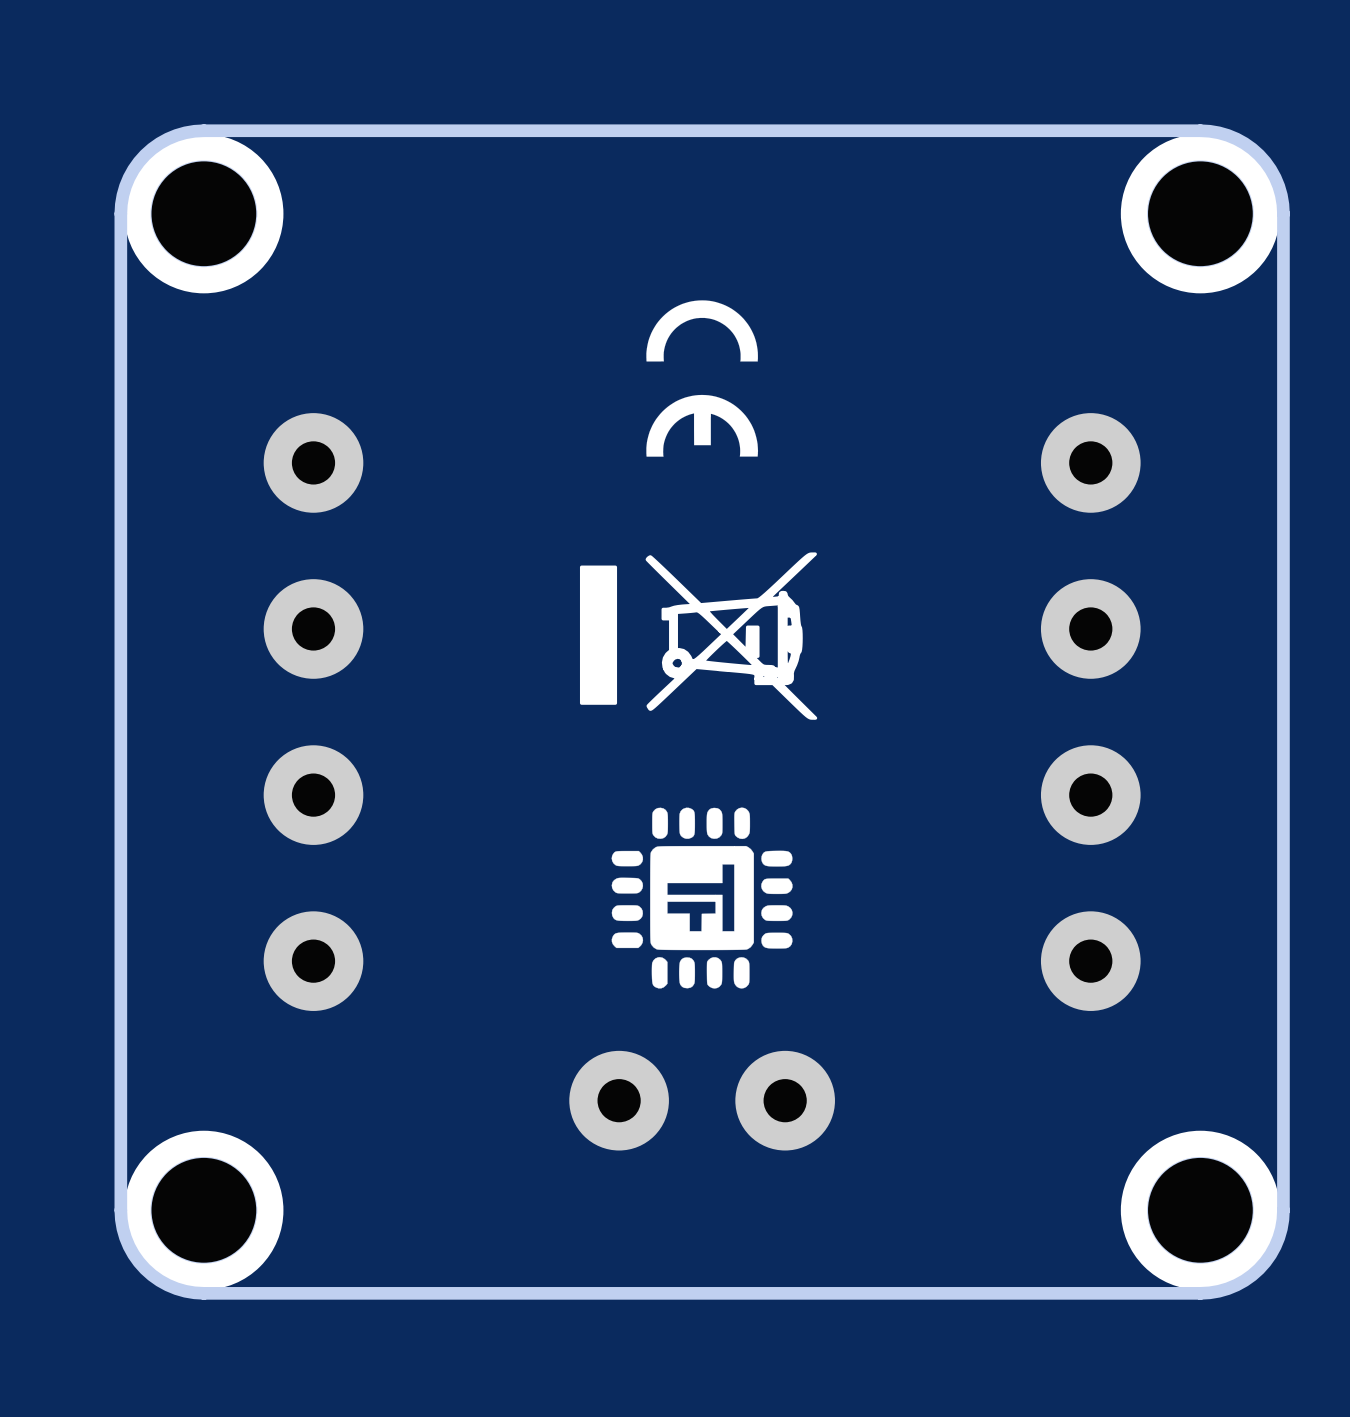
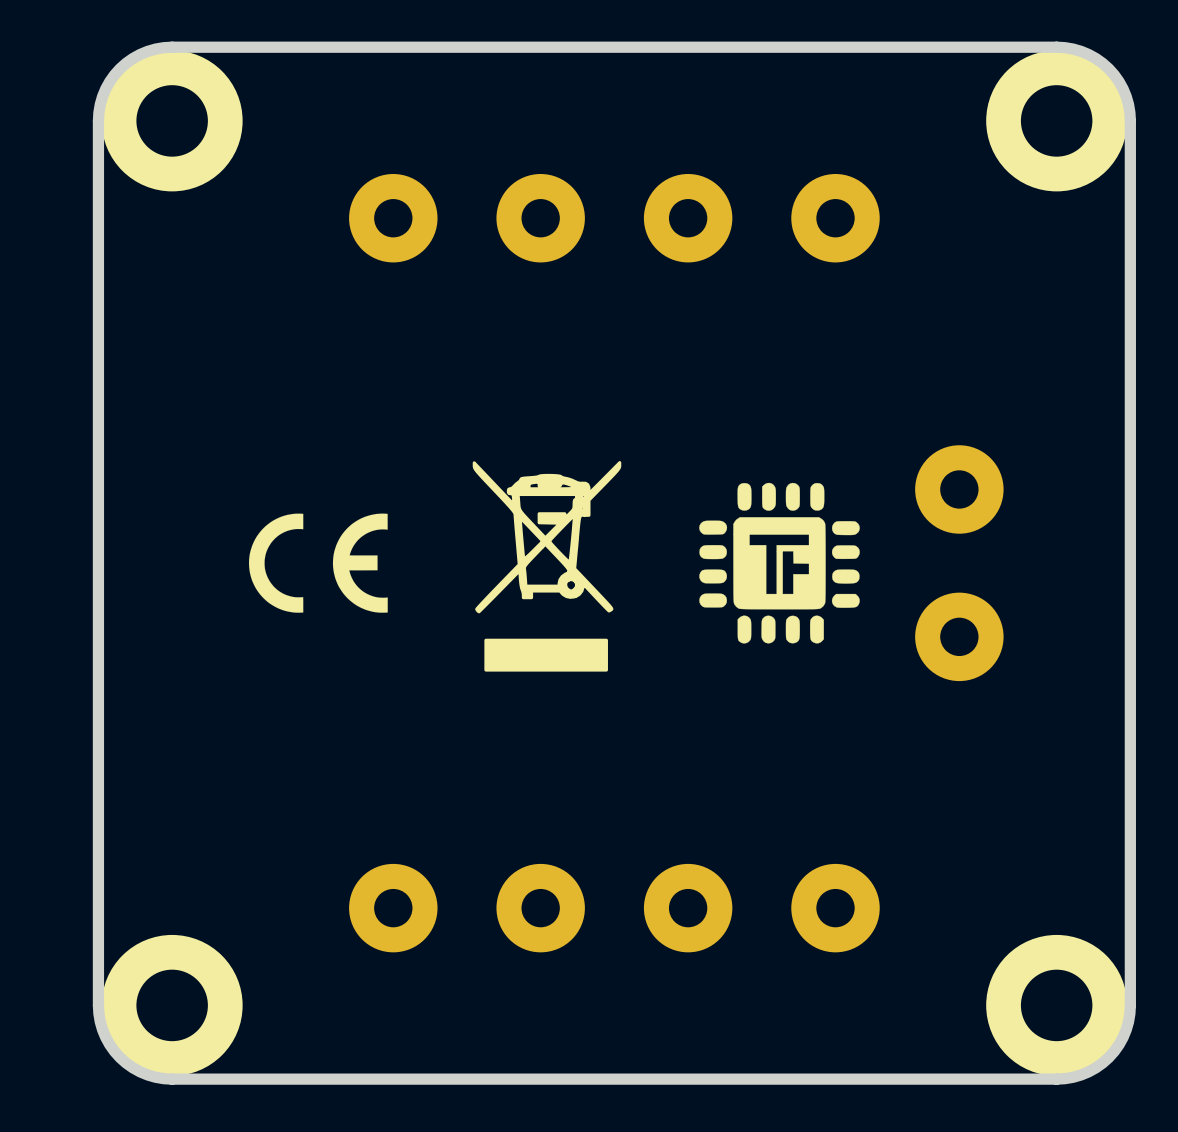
part footprint: [124, 134, 284, 294] -> [101, 50, 243, 192]
part footprint: [1120, 134, 1280, 294] -> [986, 50, 1128, 192]
drawing: [646, 300, 759, 457] -> none
part: none -> (466, 218)
part: none -> (761, 218)
part: (313, 545) -> none
part: (1090, 545) -> none
drawing: [579, 552, 818, 720] -> none
drawing: none -> [472, 461, 622, 672]
drawing: none -> [699, 482, 860, 644]
drawing: none -> [248, 513, 388, 613]
drawing: [611, 807, 793, 989] -> none
part: (313, 878) -> none
part: (1090, 878) -> none
part: none -> (466, 908)
part: none -> (761, 908)
part footprint: [124, 1130, 284, 1290] -> [101, 934, 243, 1076]
part footprint: [1120, 1130, 1280, 1290] -> [986, 934, 1128, 1076]

